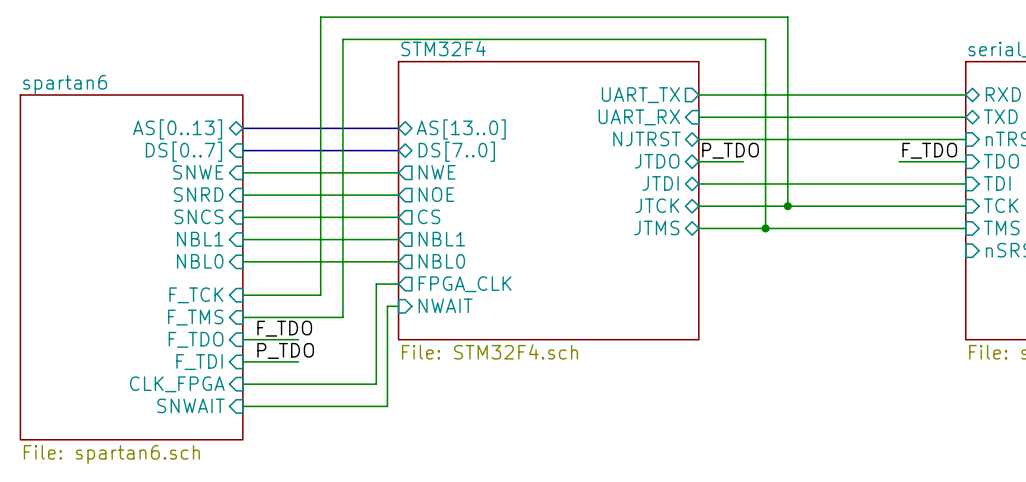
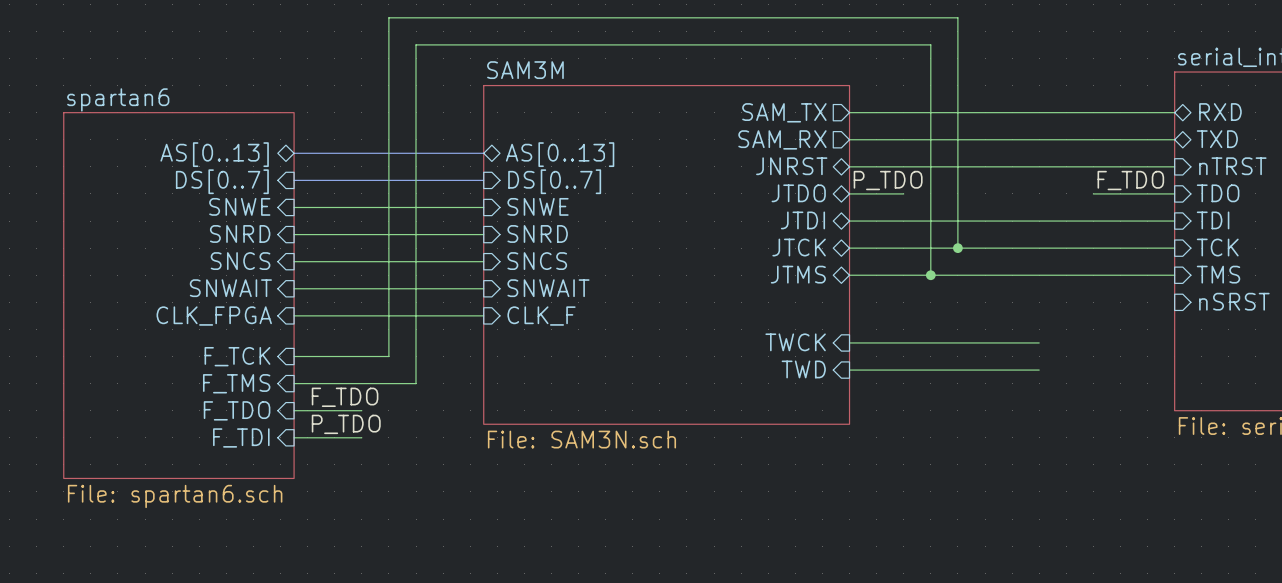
sheet spartan6 name position: spartan6 (65, 84) -> spartan6 (118, 99)
sheet spartan6 shape: [20, 95, 243, 440] -> [63, 112, 295, 479]
sheet pin: UART_TX (640, 95) -> SAM_TX (784, 112)
sheet pin shape: input (639, 117) -> output (782, 139)
sheet pin: UART_RX (639, 117) -> SAM_RX (782, 139)
sheet pin: AS[13..0] (461, 129) -> AS[0..13] (560, 154)
sheet pin: NJTRST (646, 138) -> JNRST (791, 166)
sheet pin shape: bidirectional (456, 151) -> input (554, 181)
sheet pin: DS[7..0] (456, 151) -> DS[0..7] (554, 181)
sheet pin shape: output (437, 172) -> input (538, 206)
sheet pin: NWE (437, 172) -> SNWE (538, 206)
sheet pin shape: output (436, 194) -> input (537, 233)
sheet pin: NOE (436, 194) -> SNRD (537, 233)
sheet STM32F4: File: STM32F4.sch (548, 200) -> none
sheet SAM3M: none -> File: SAM3N.sch (666, 254)
sheet pin shape: output (429, 216) -> input (537, 261)
sheet pin: CS (429, 216) -> SNCS (537, 261)
sheet pin: NBL1 (200, 239) -> SNWAIT (230, 288)
sheet pin shape: output (441, 239) -> input (548, 288)
sheet pin: NBL1 (441, 239) -> SNWAIT (548, 288)
sheet pin: NBL0 (200, 261) -> CLK_FPGA (214, 316)
sheet pin shape: output (441, 261) -> input (541, 316)
sheet pin: NBL0 (441, 261) -> CLK_F (541, 316)
sheet pin: none -> TWCK (795, 342)
wire: (398, 284) (376, 284) (376, 384) (242, 384) -> none
sheet pin: FPGA_CLK (465, 284) -> none
wire: none -> (849, 342) (1039, 342)
sheet pin: NWAIT (445, 305) -> none
sheet pin: none -> TWD (803, 369)
wire: (398, 306) (387, 306) (387, 406) (242, 406) -> none
wire: none -> (849, 370) (1039, 370)
sheet pin: CLK_FPGA (177, 384) -> none
sheet pin: SNWAIT (190, 405) -> none
sheet spartan6 value position: File: spartan6.sch (111, 454) -> File: spartan6.sch (175, 496)

